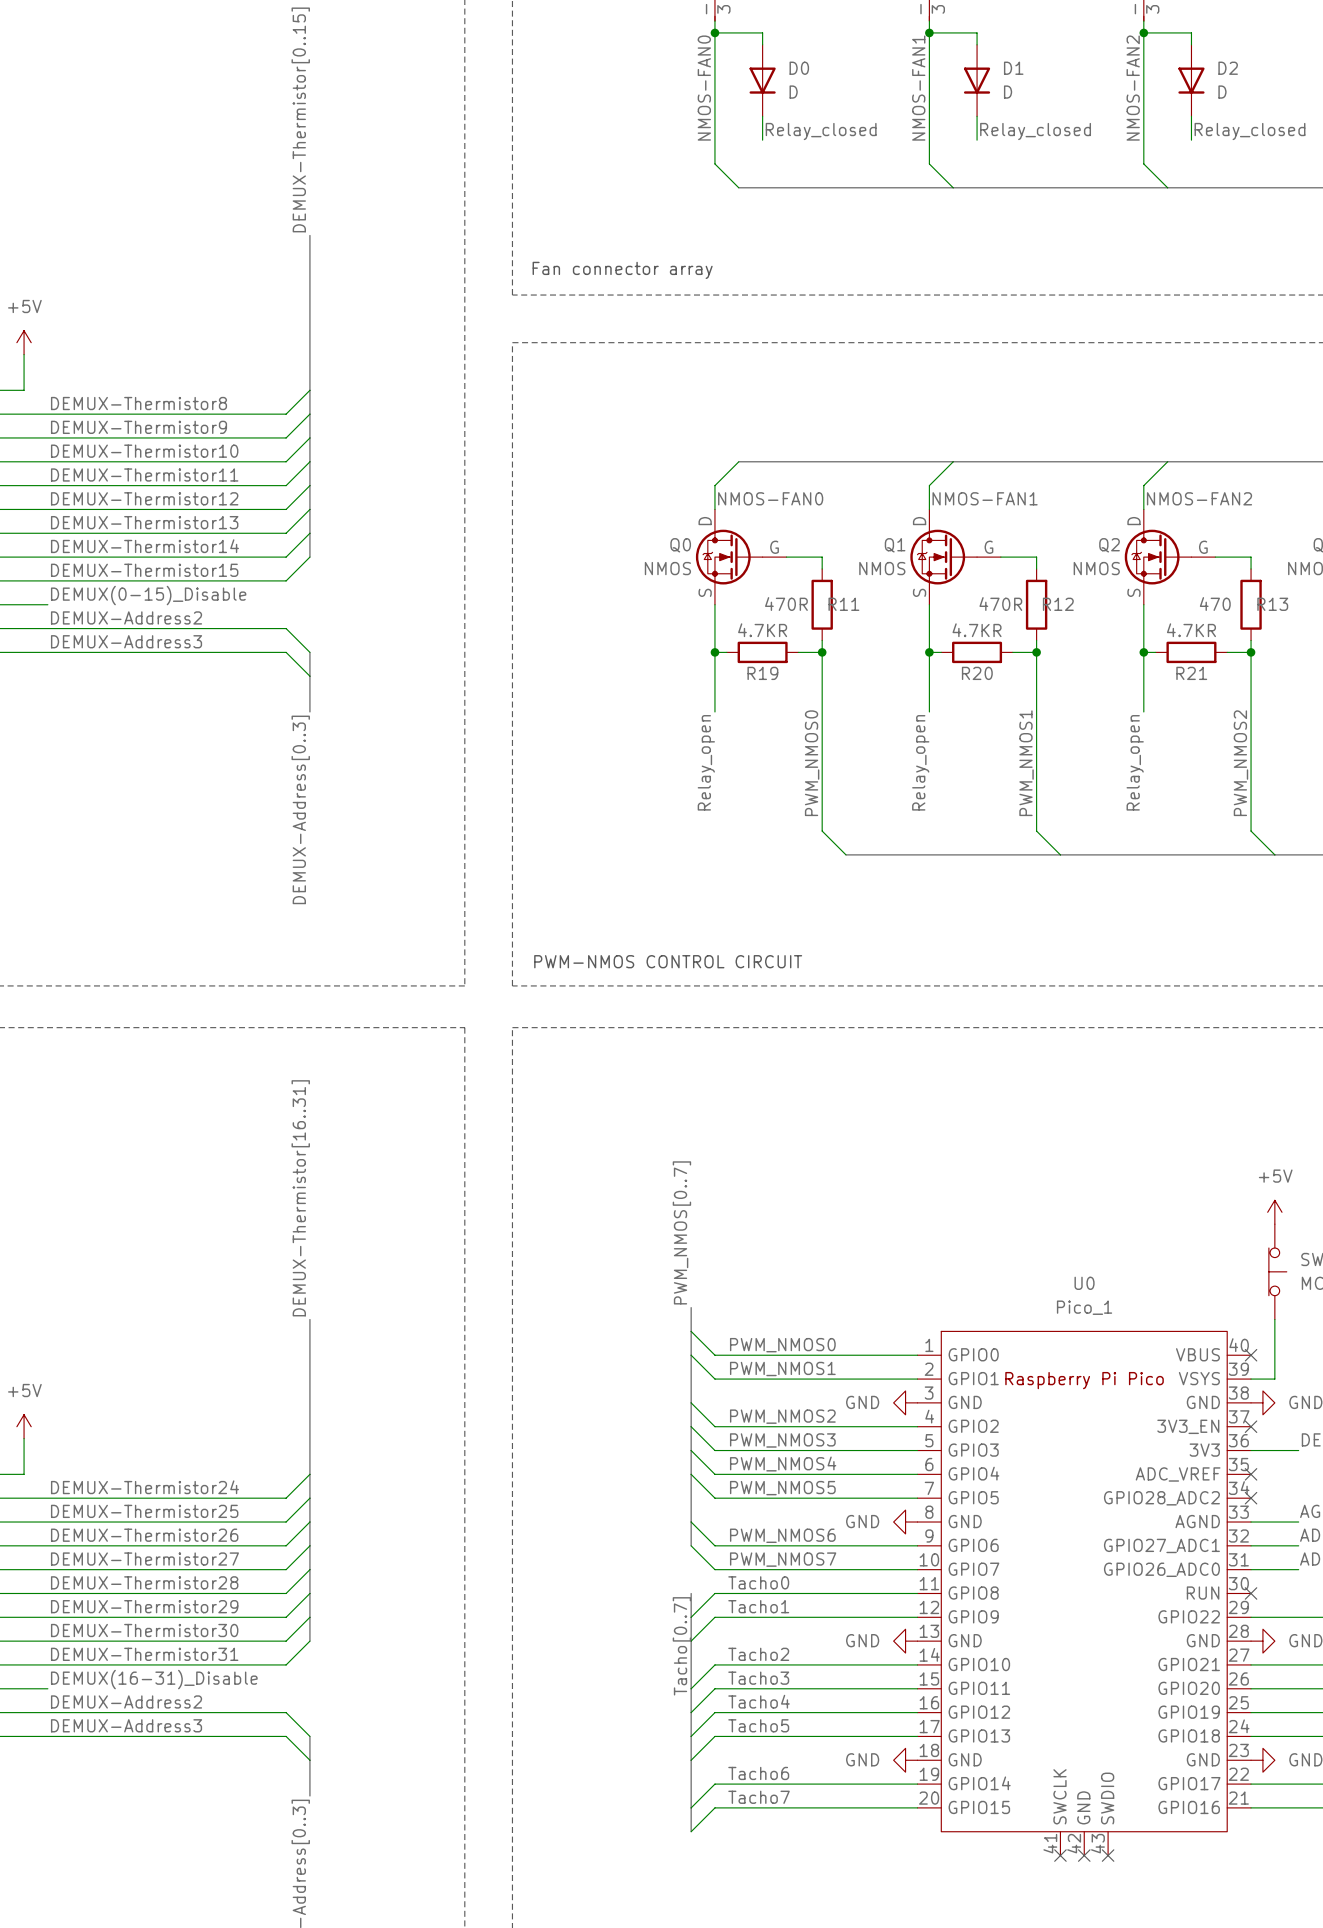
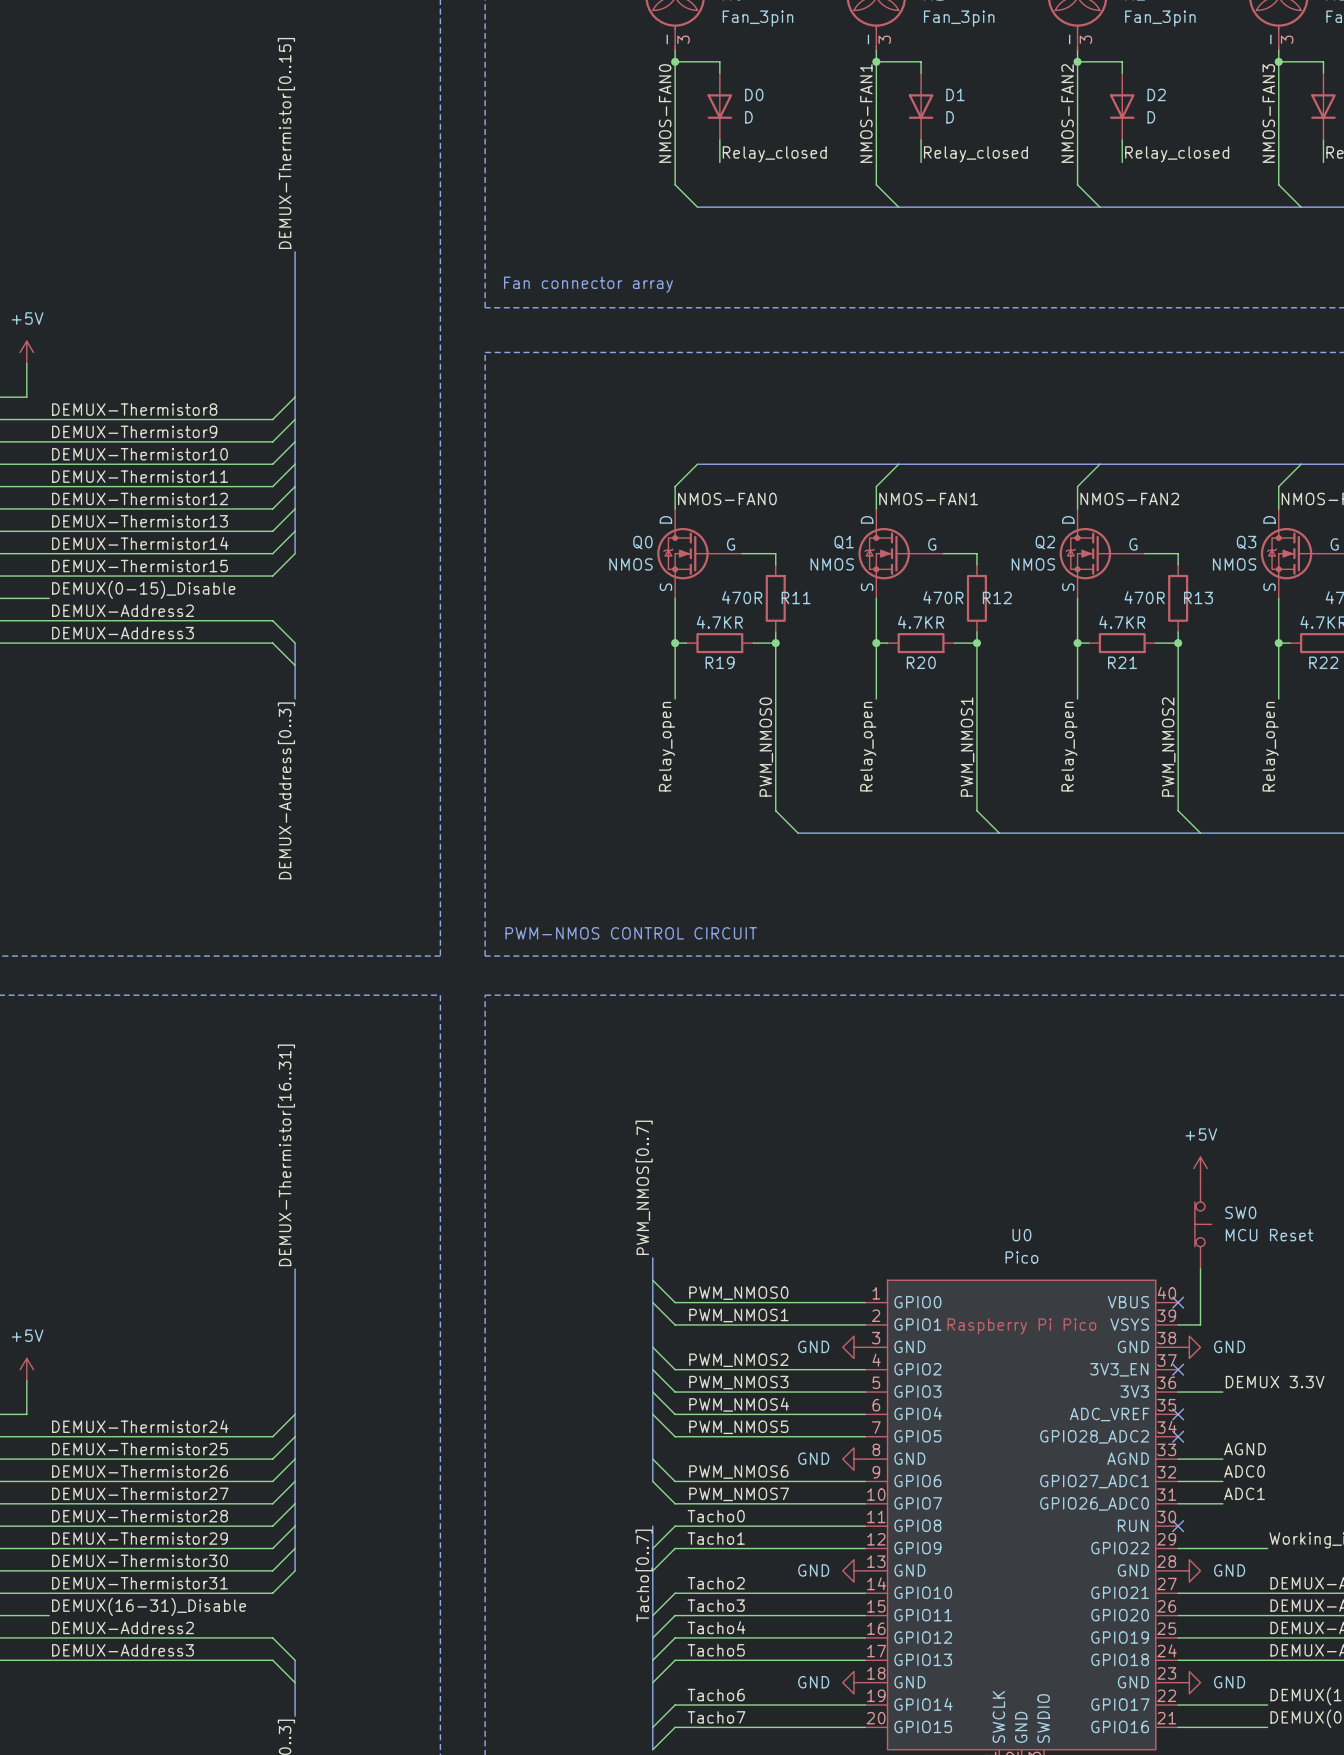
R13 value: 470 (1215, 604) -> 470R (1144, 597)
U0 value: Pico_1 (1084, 1307) -> Pico (1021, 1257)

